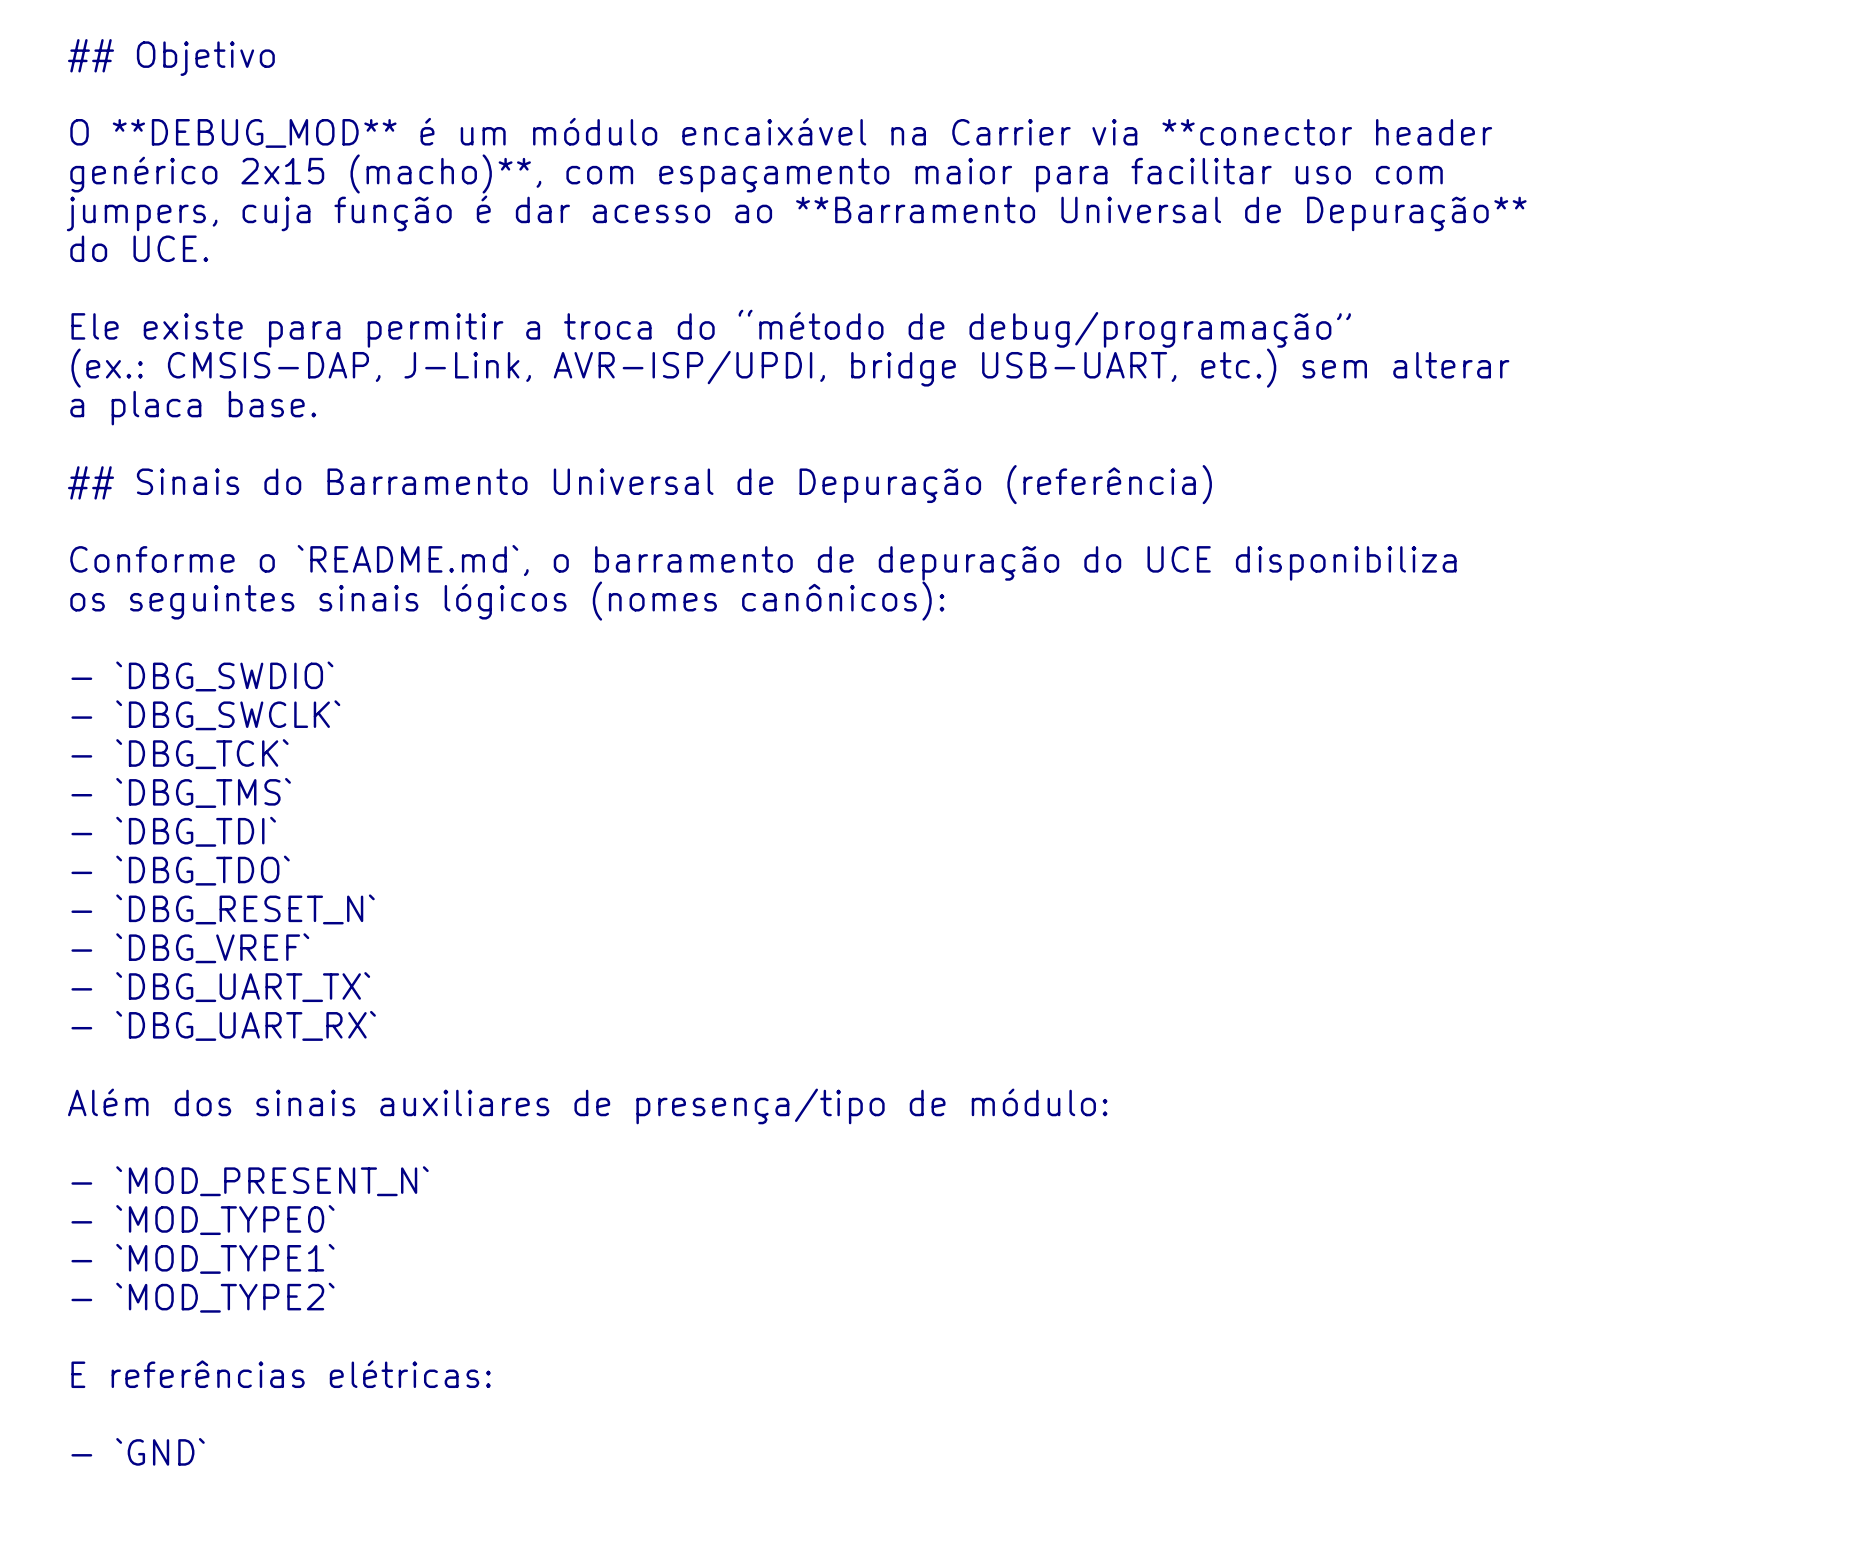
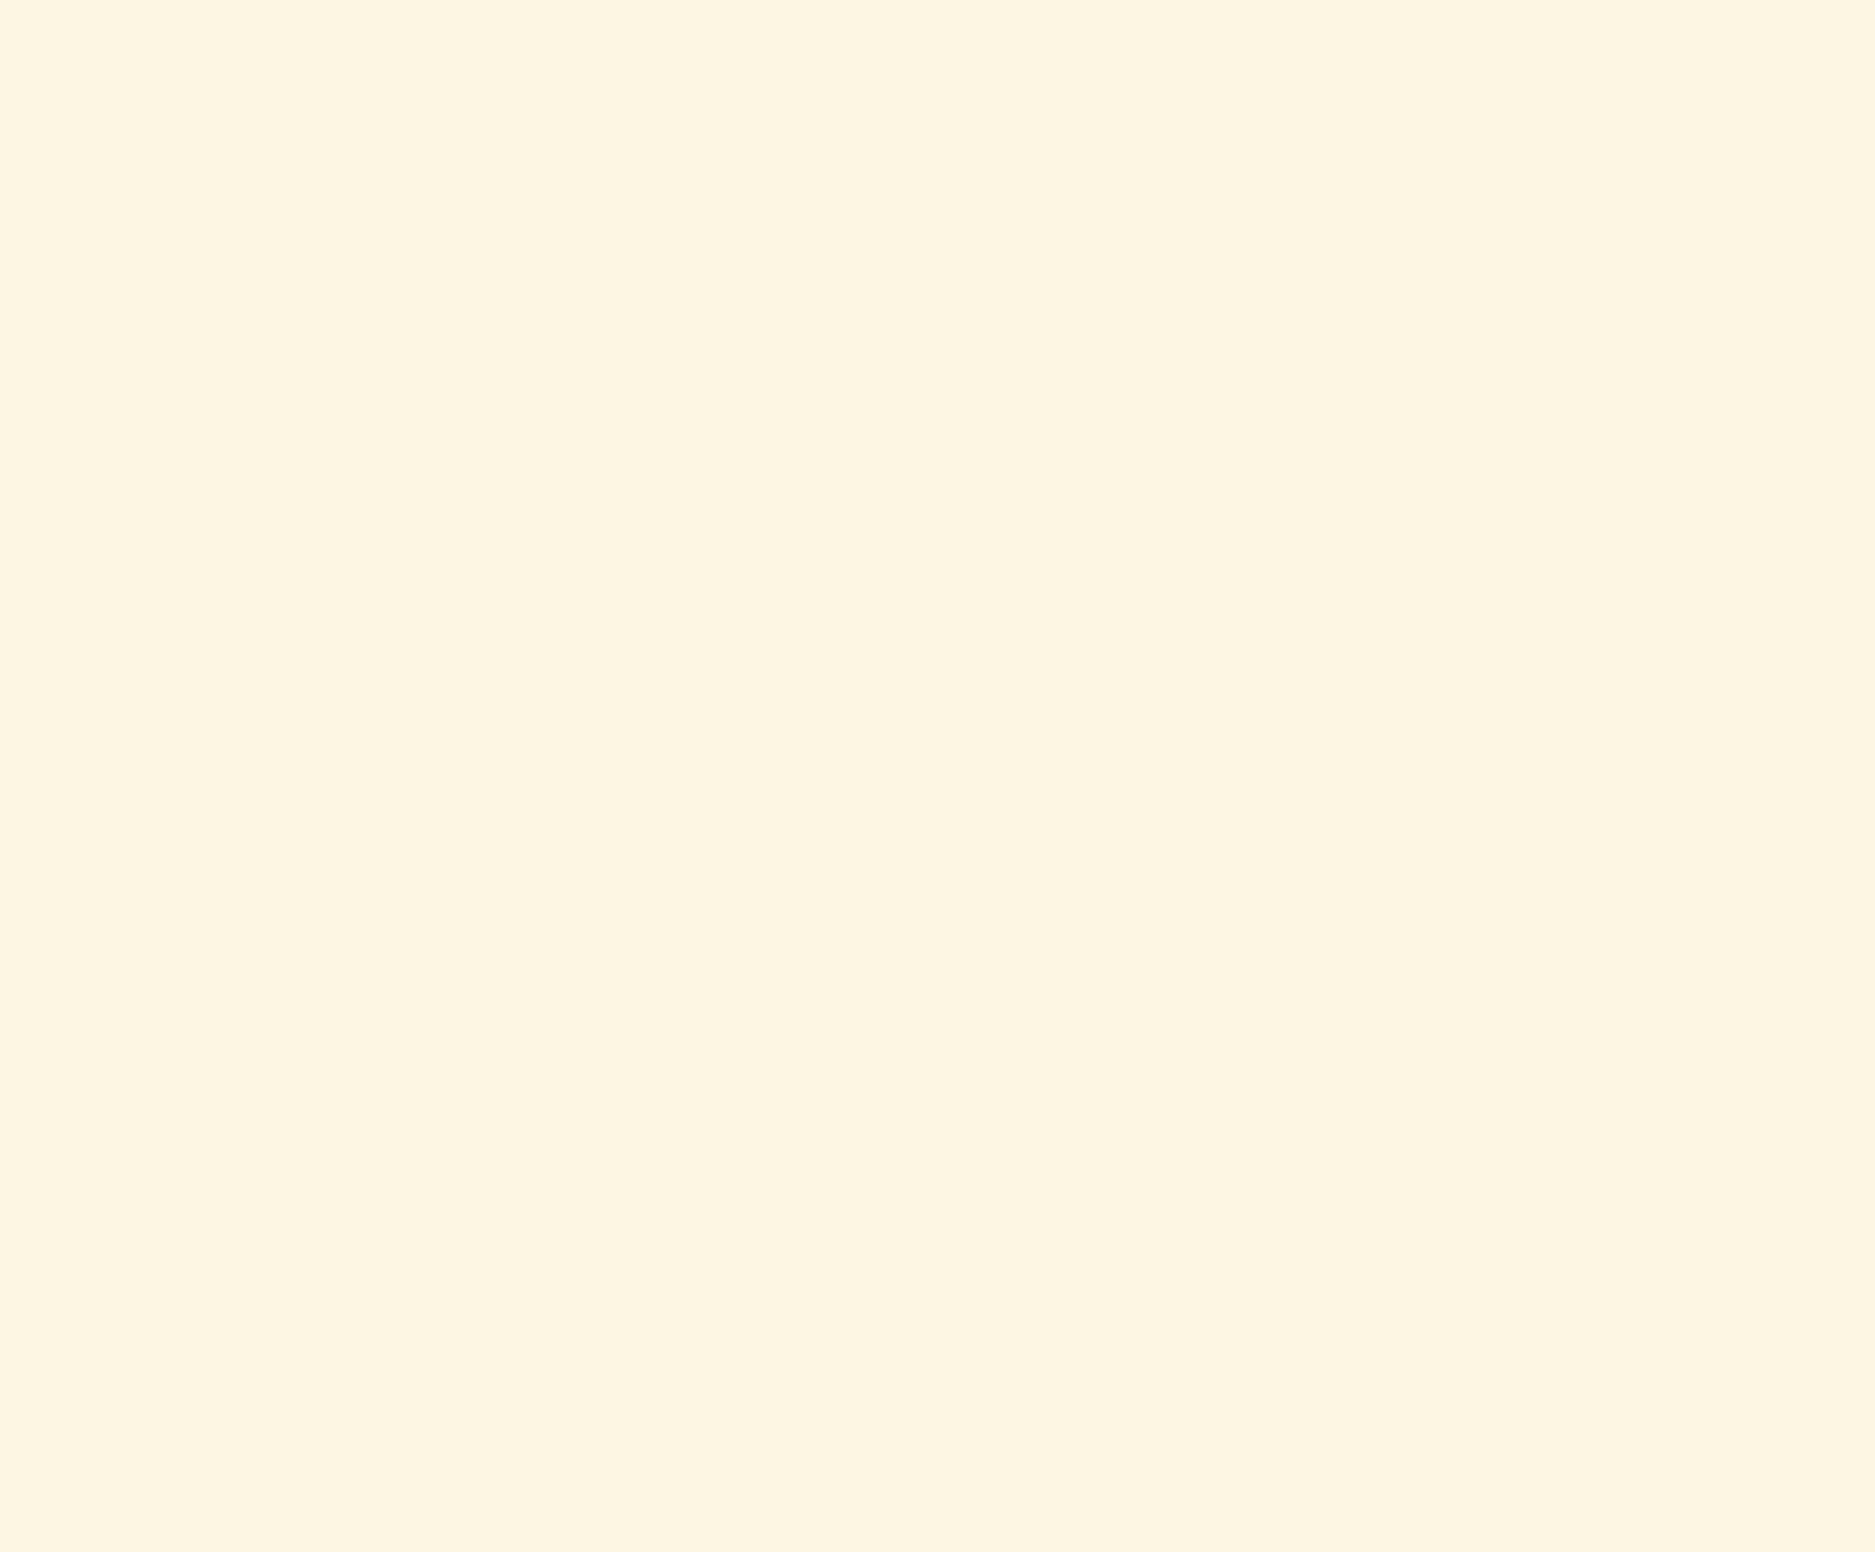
text: ## Objetivo (171, 57) -> none
text: O **DEBUG_MOD** é um módulo encaixável na Carrier via **conector header (781, 132) -> none
text: genérico 2x15 (macho)**, com espaçamento maior para facilitar uso com (756, 173) -> none
text: jumpers, cuja função é dar acesso ao **Barramento Universal de Depuração** (796, 213) -> none
text: do UCE. (139, 248) -> none
text: Ele existe para permitir a troca do “método de debug/programação” (711, 328) -> none
text: (ex.: CMSIS-DAP, J-Link, AVR-ISP/UPDI, bridge USB-UART, etc.) sem alterar (790, 368) -> none
text: a placa base. (193, 408) -> none
text: ## Sinais do Barramento Universal de Depuração (referência) (639, 484) -> none
text: Conforme o `README.md`, o barramento de depuração do UCE disponibiliza (763, 562) -> none
text: os seguintes sinais lógicos (nomes canônicos): (507, 601) -> none
text: - `DBG_SWDIO` (202, 676) -> none
text: - `DBG_SWCLK` (205, 715) -> none
text: - `DBG_TCK` (180, 754) -> none
text: - `DBG_TMS` (181, 792) -> none
text: - `DBG_TDI` (173, 831) -> none
text: - `DBG_TDO` (180, 870) -> none
text: - `DBG_RESET_N` (223, 909) -> none
text: - `DBG_VREF` (190, 948) -> none
text: - `DBG_UART_TX` (220, 987) -> none
text: - `DBG_UART_RX` (223, 1025) -> none
text: Além dos sinais auxiliares de presença/tipo de módulo: (587, 1106) -> none
text: - `MOD_PRESENT_N` (250, 1181) -> none
text: - `MOD_TYPE0` (202, 1220) -> none
text: - `MOD_TYPE1` (202, 1258) -> none
text: - `MOD_TYPE2` (202, 1297) -> none
text: E referências elétricas: (281, 1374) -> none
text: - `GND` (138, 1451) -> none

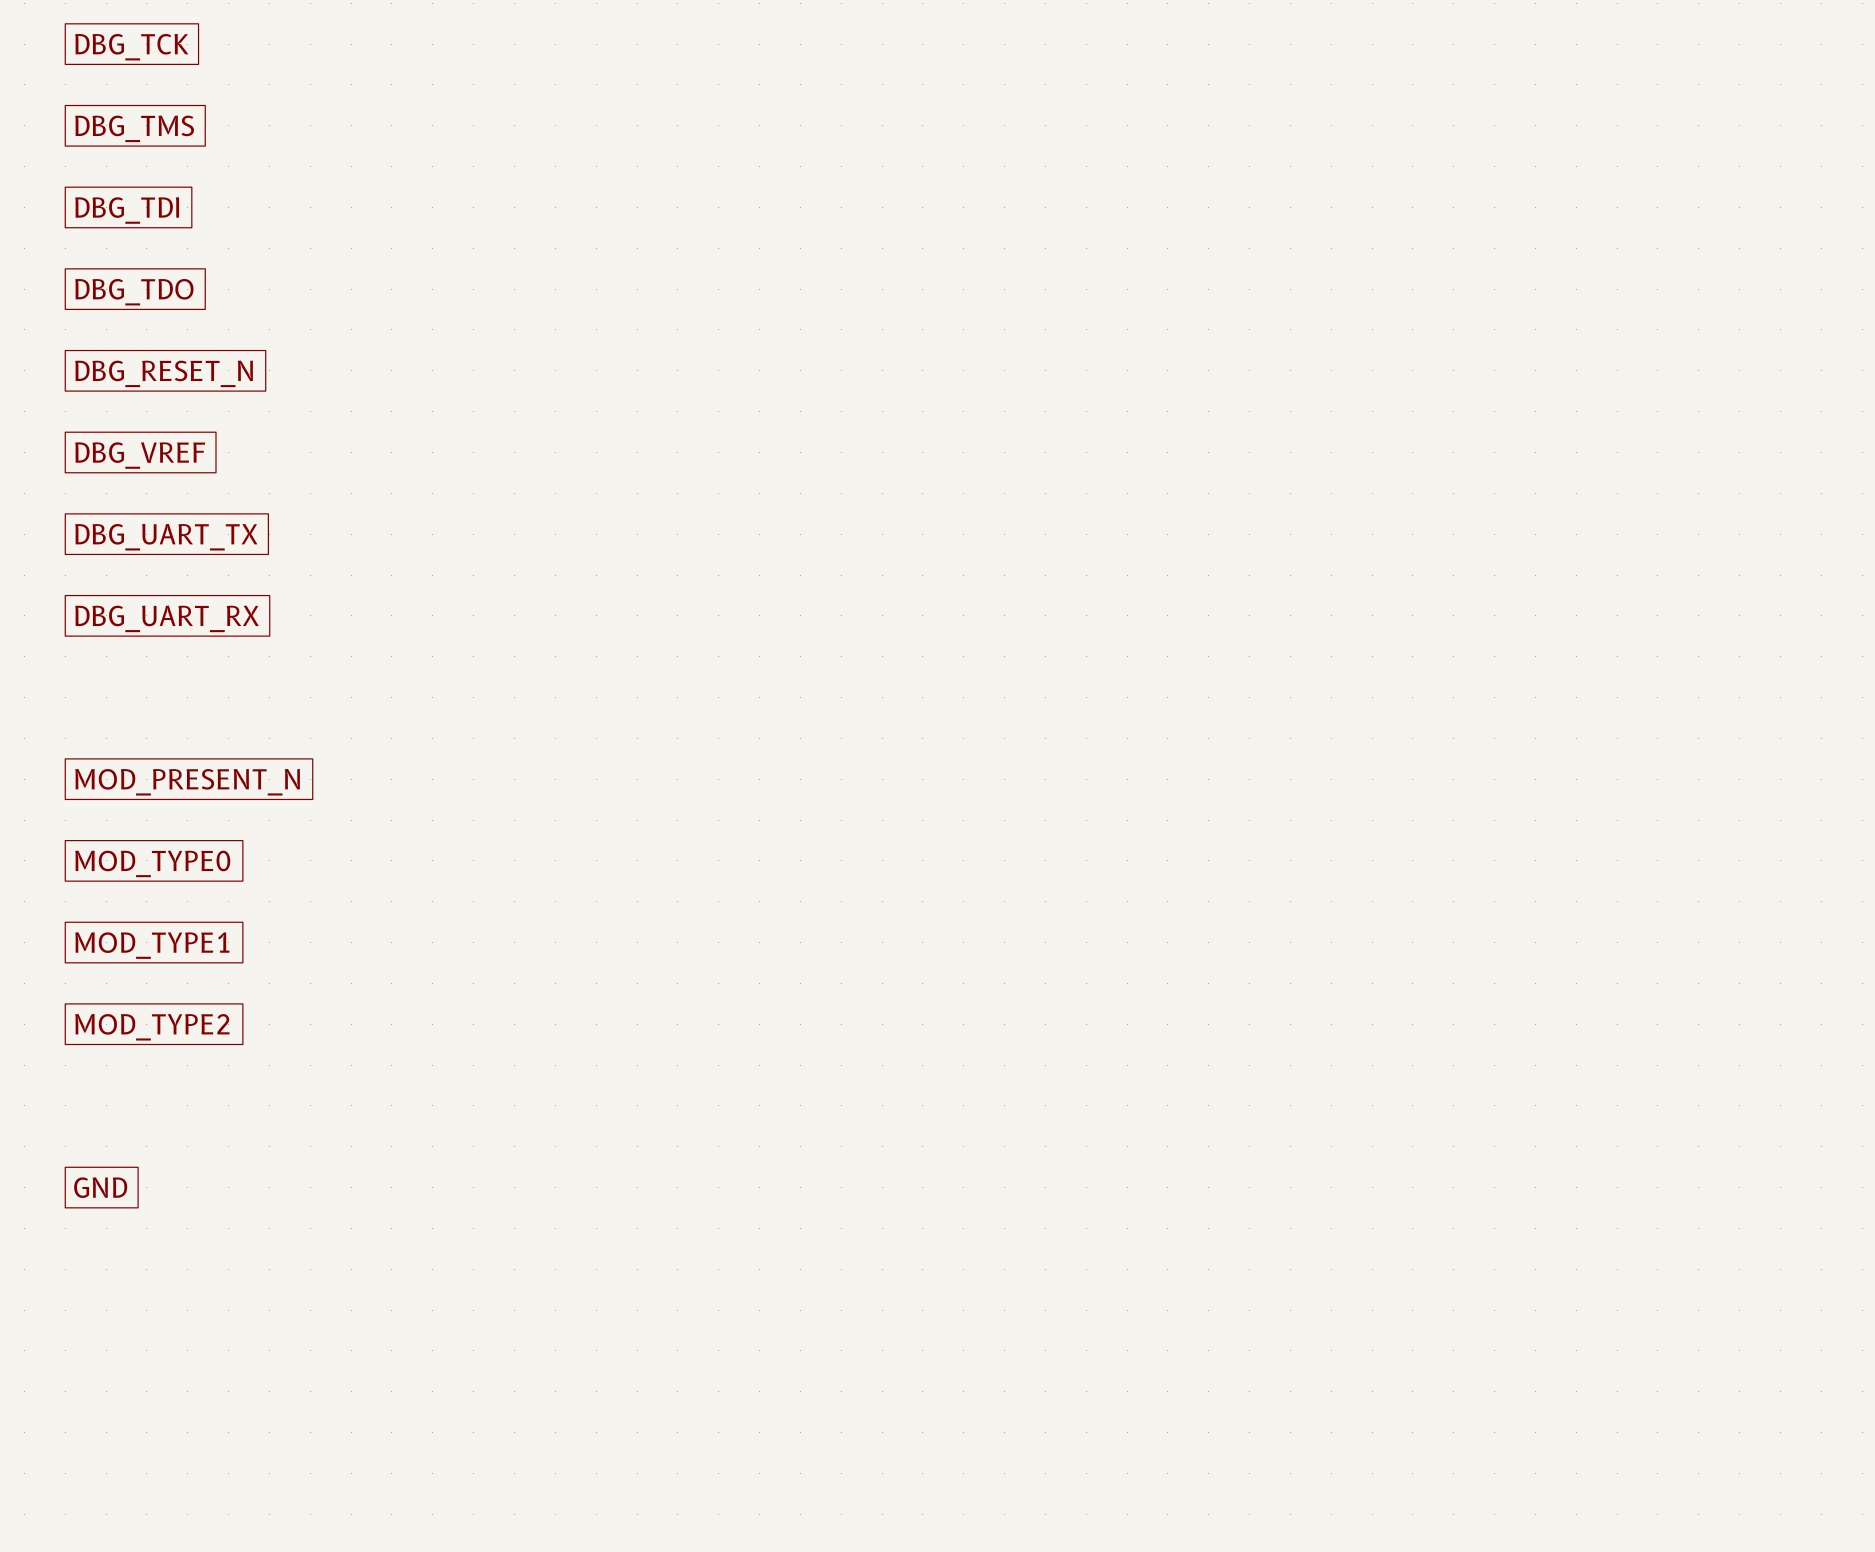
global label: none -> DBG_TCK (131, 47)
global label: none -> DBG_TMS (134, 128)
global label: none -> DBG_TDI (127, 210)
global label: none -> DBG_TDO (134, 292)
global label: none -> DBG_RESET_N (164, 373)
global label: none -> DBG_VREF (140, 455)
global label: none -> DBG_UART_TX (166, 537)
global label: none -> DBG_UART_RX (167, 618)
global label: none -> MOD_PRESENT_N (187, 782)
global label: none -> MOD_TYPE0 (152, 863)
global label: none -> MOD_TYPE1 (152, 945)
global label: none -> MOD_TYPE2 (152, 1027)
global label: none -> GND (100, 1187)

